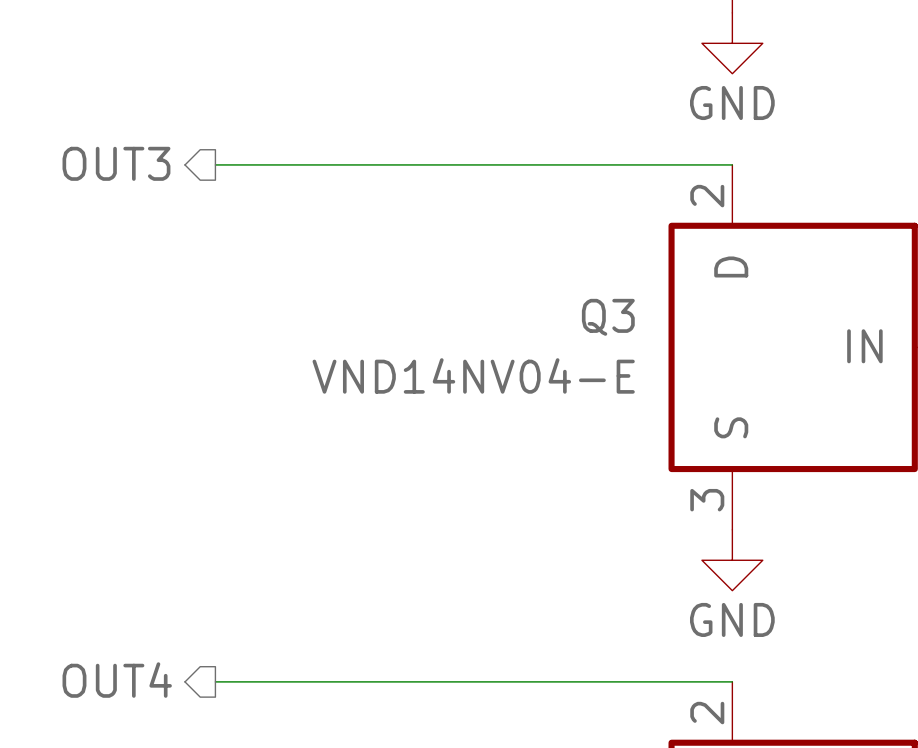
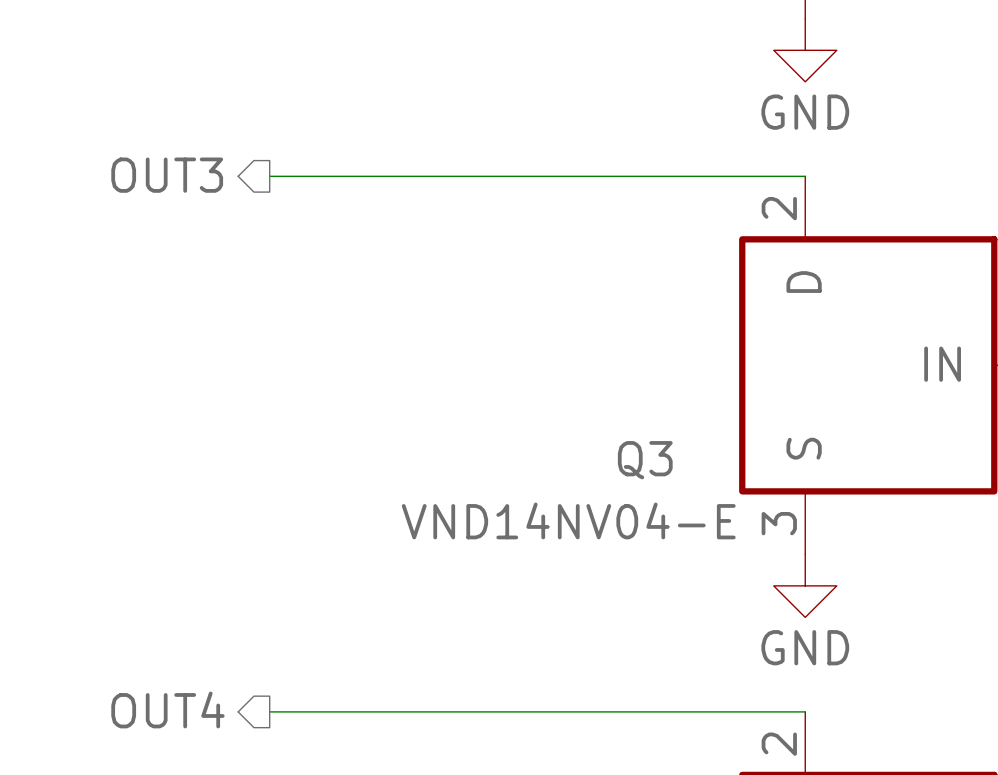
Q3 name position: Q3 (608, 317) -> Q3 (645, 460)
Q3 value position: VND14NV04-E (473, 375) -> VND14NV04-E (568, 520)

